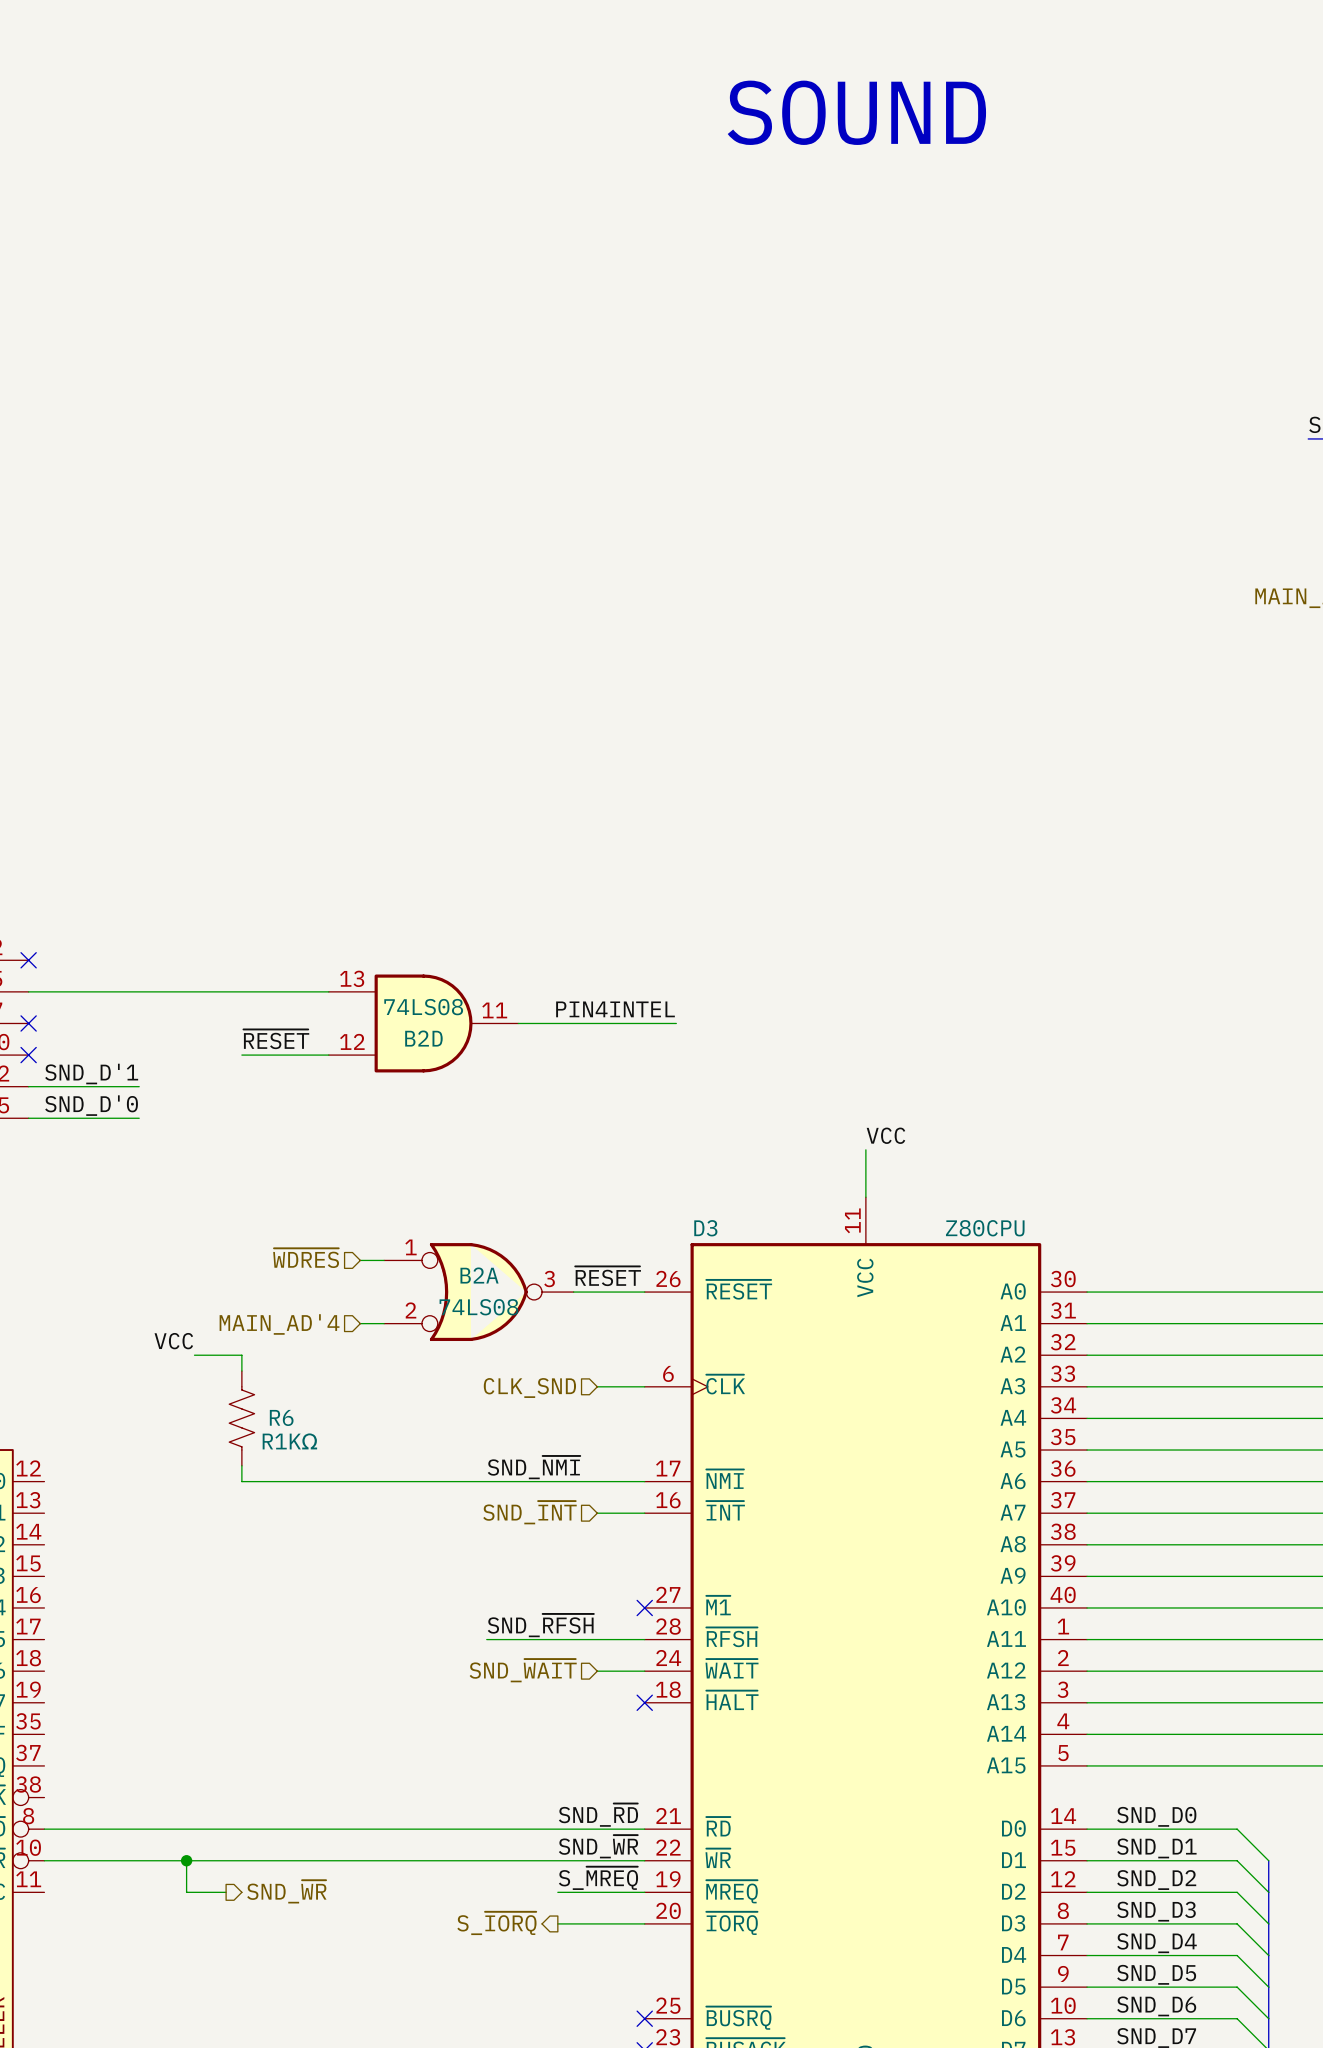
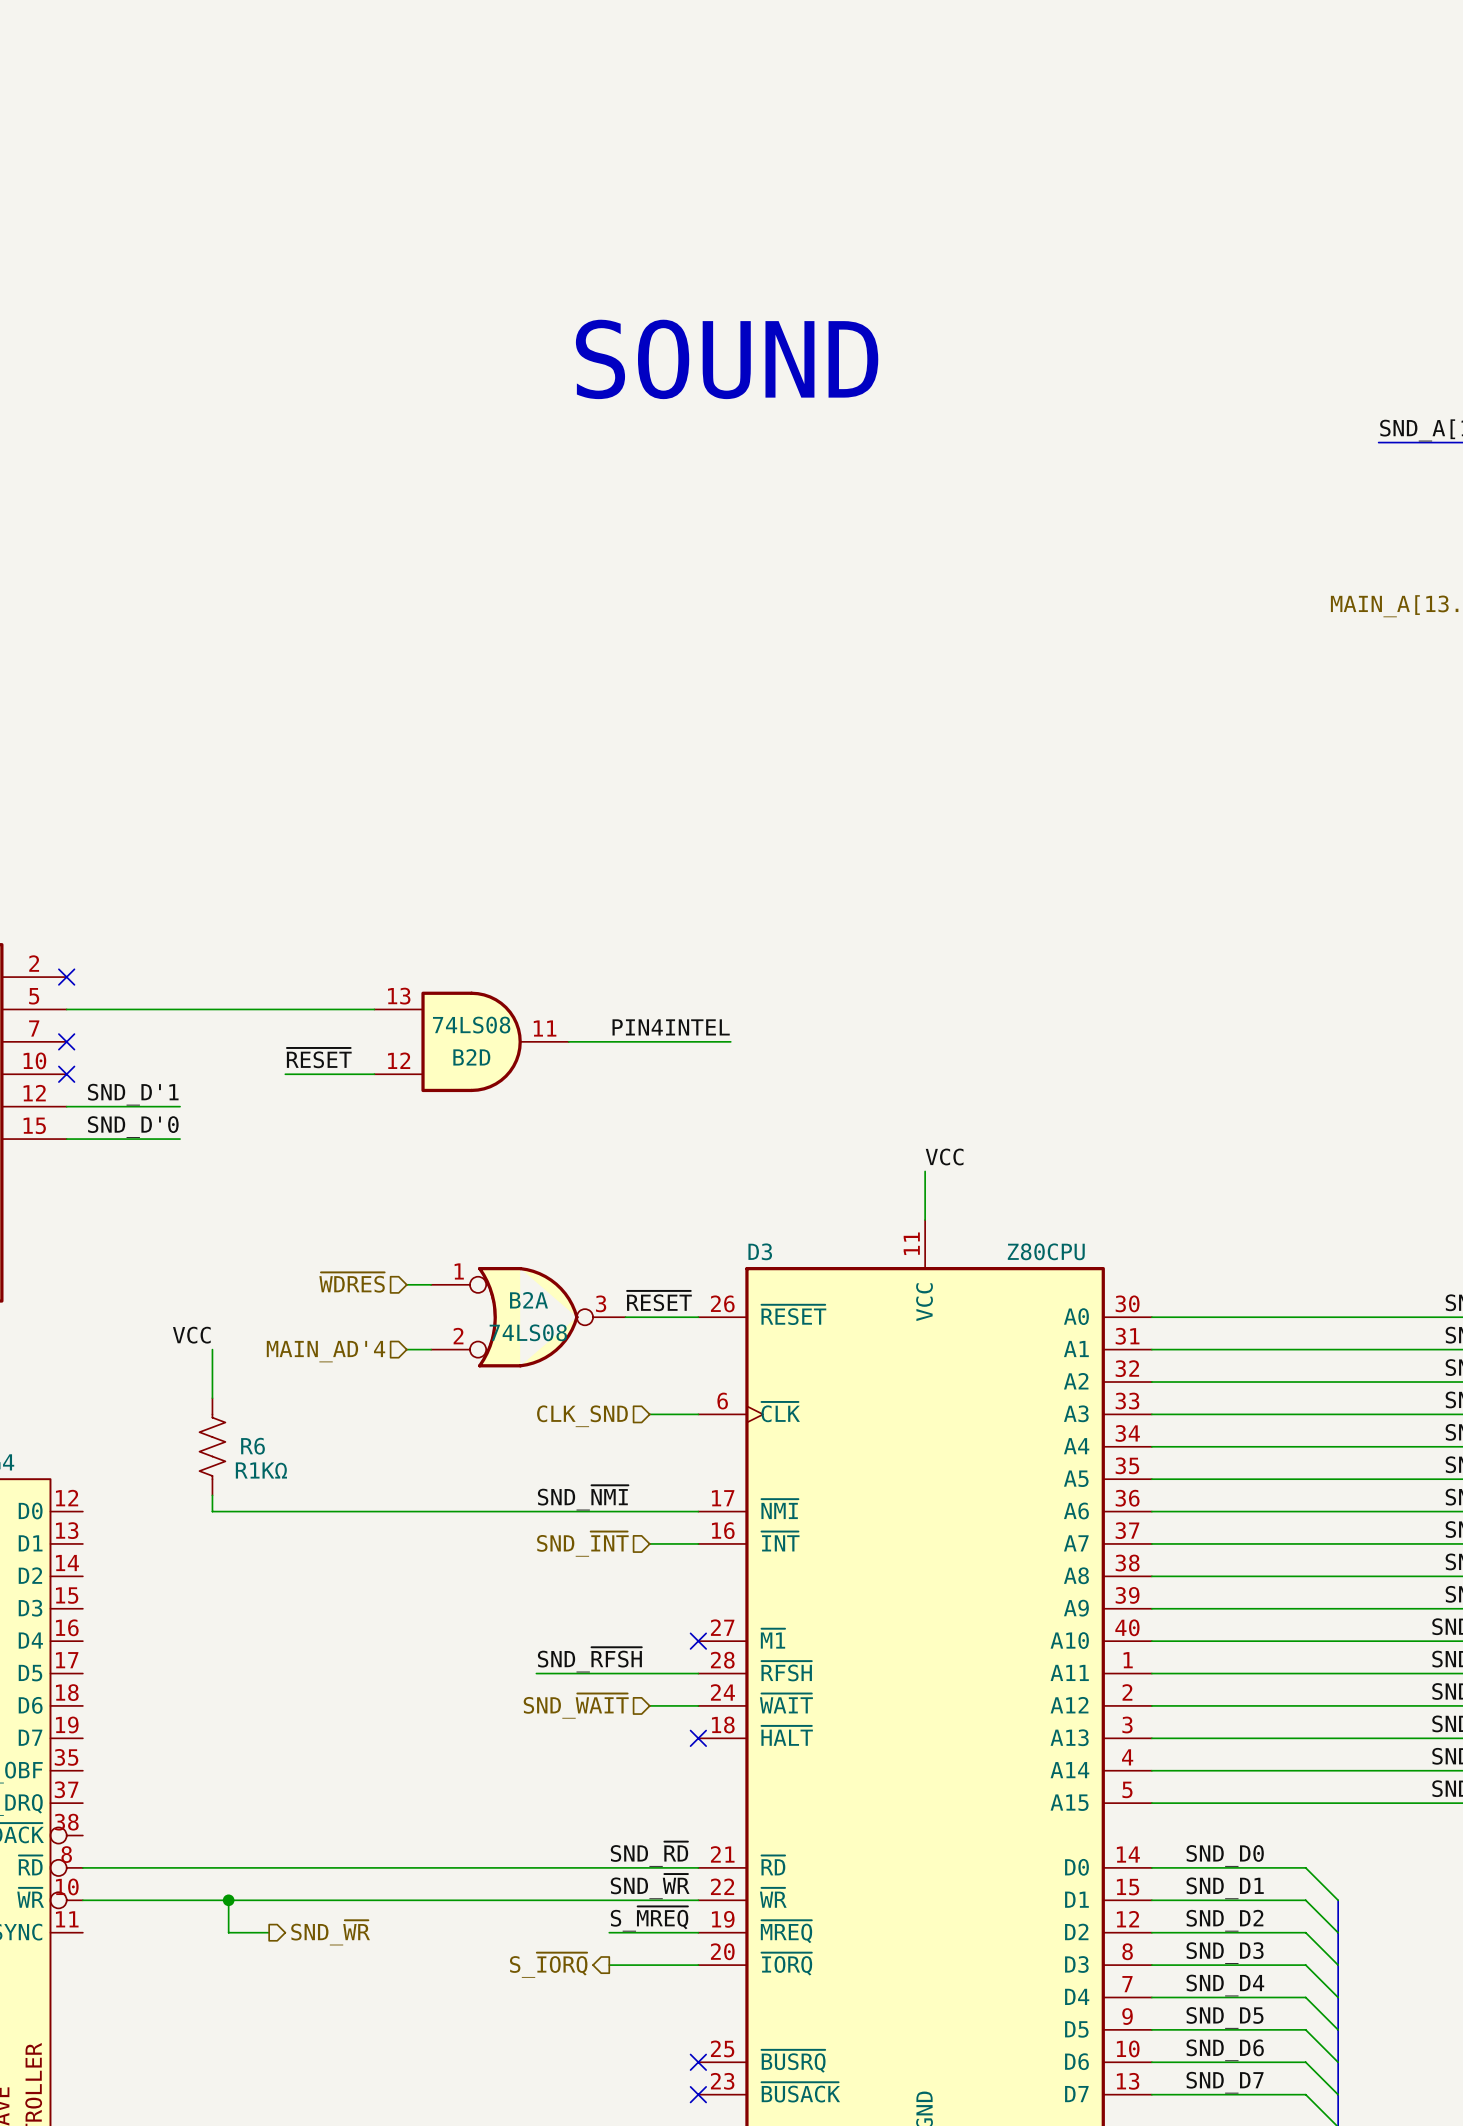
text: SOUND (856, 112) -> none
text: none -> SOUND (727, 359)
wire: none -> (212, 1349) (212, 1398)
label position: VCC (173, 1341) -> VCC (191, 1335)
wire: (194, 1355) (241, 1355) (241, 1371) -> none
R1KΩ position: (241, 1418) -> (212, 1446)
wire: (241, 1465) (241, 1481) -> (212, 1495) (212, 1511) (285, 1511)

